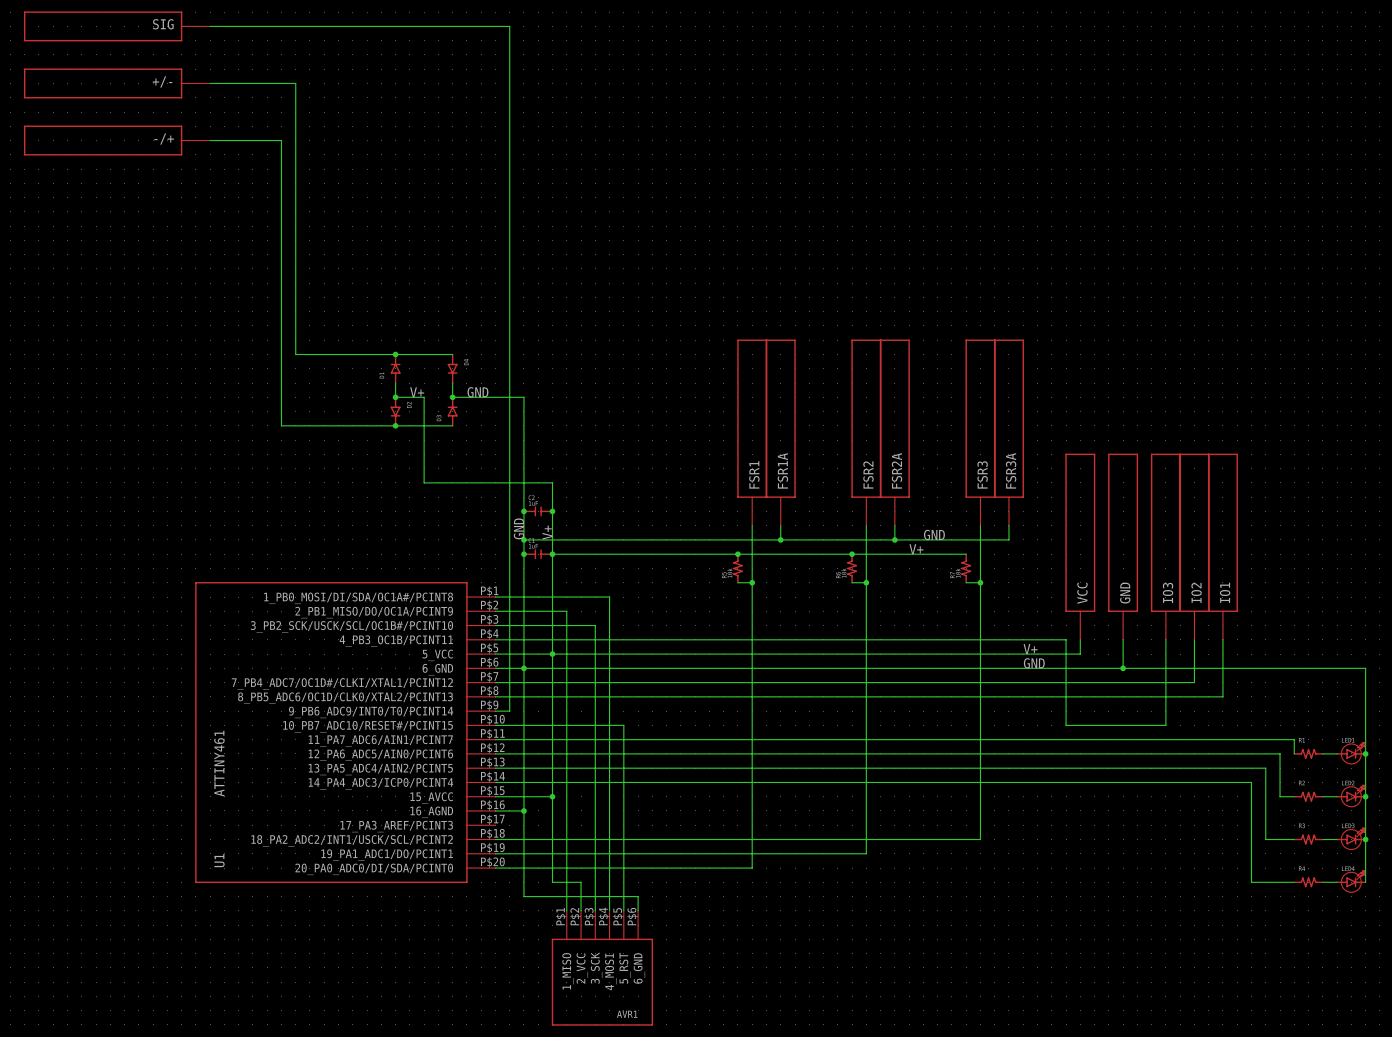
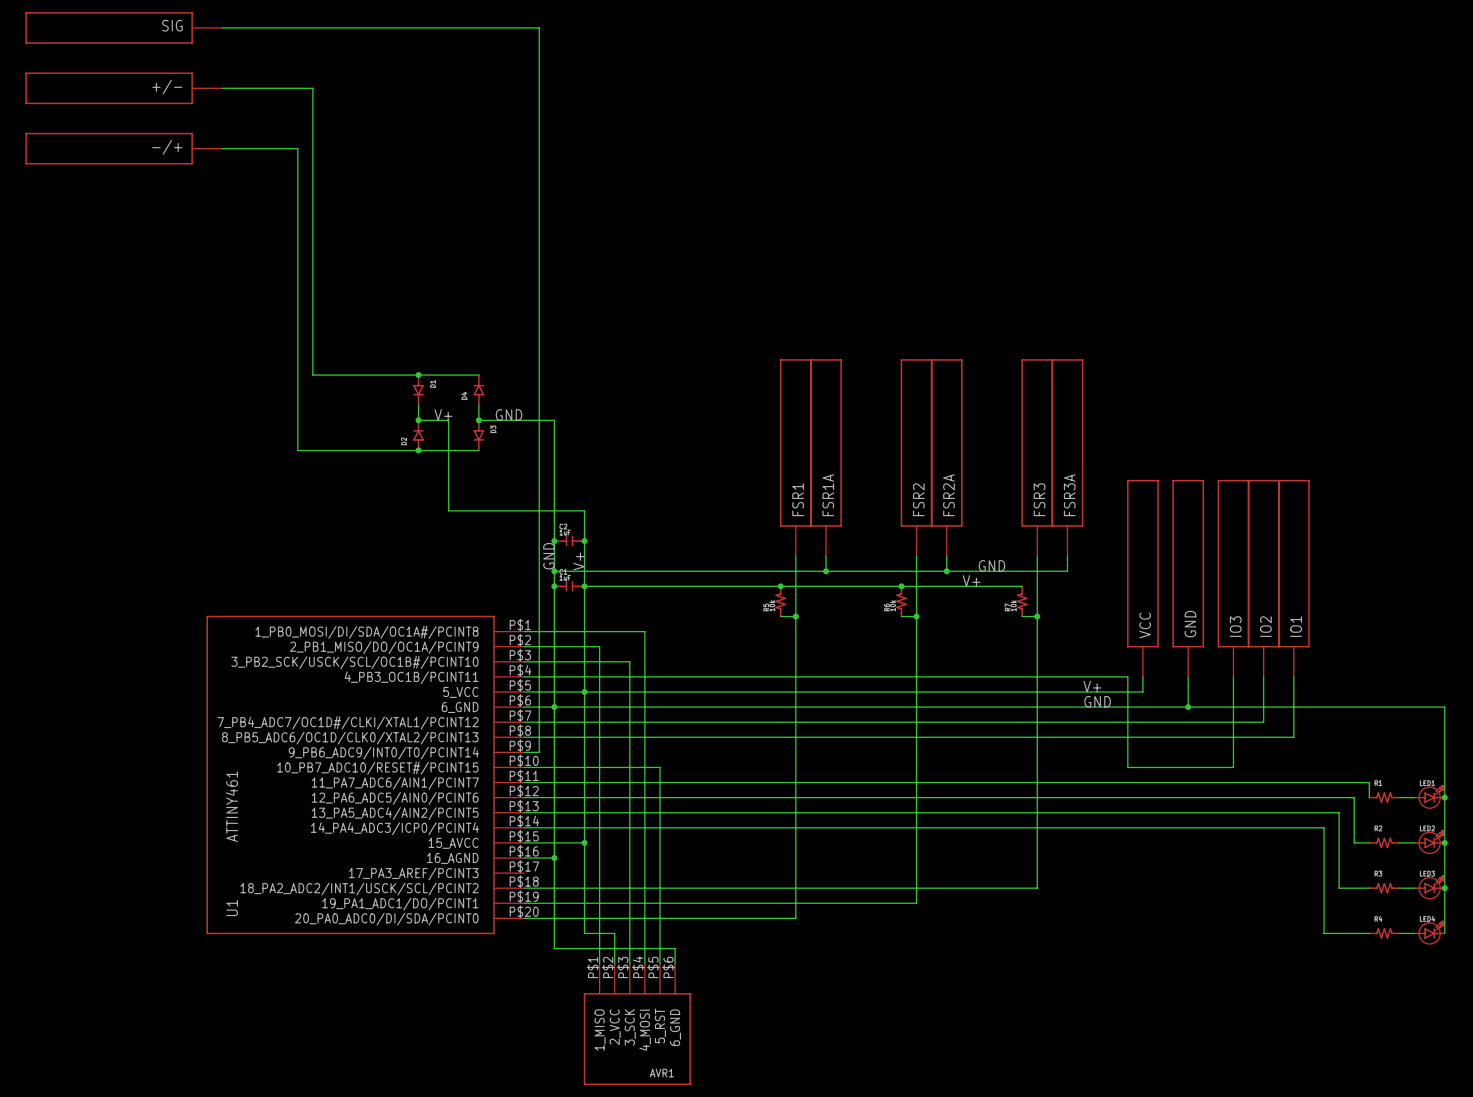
part rotation: 0° (395, 368) -> 180° (418, 390)
part rotation: 0° (452, 368) -> 180° (478, 390)
part rotation: 0° (395, 411) -> 180° (418, 435)
part rotation: 0° (452, 411) -> 180° (478, 435)

